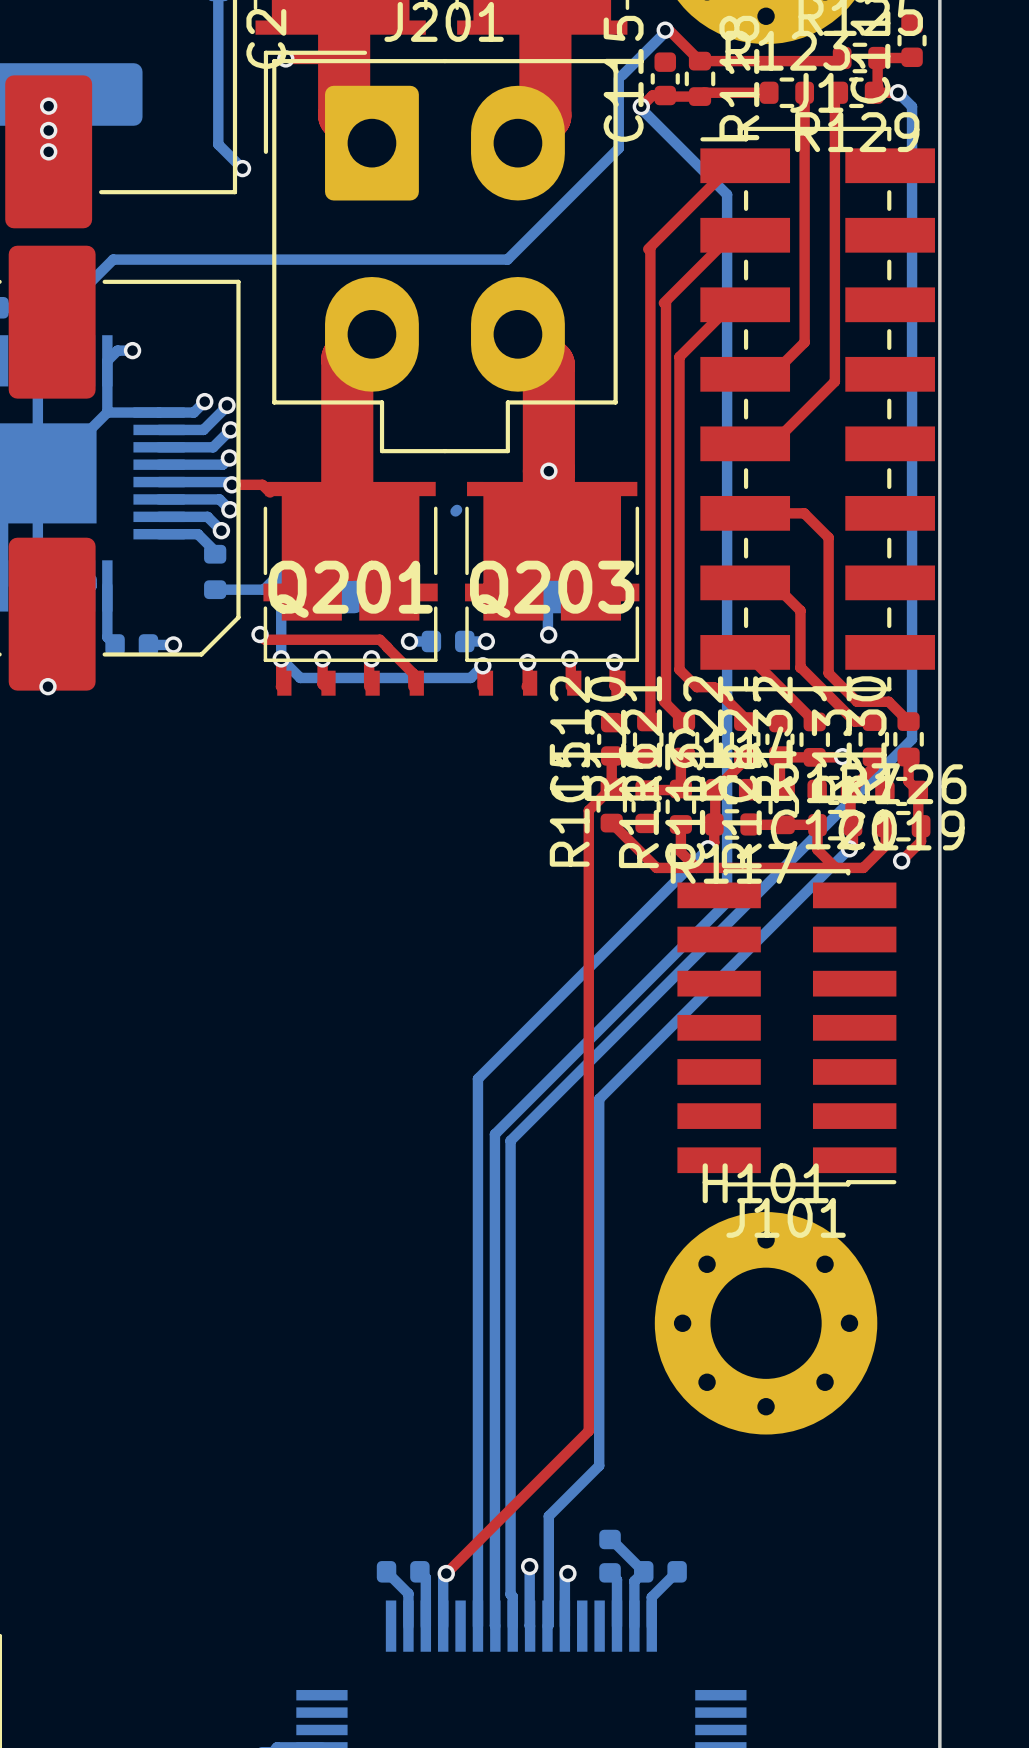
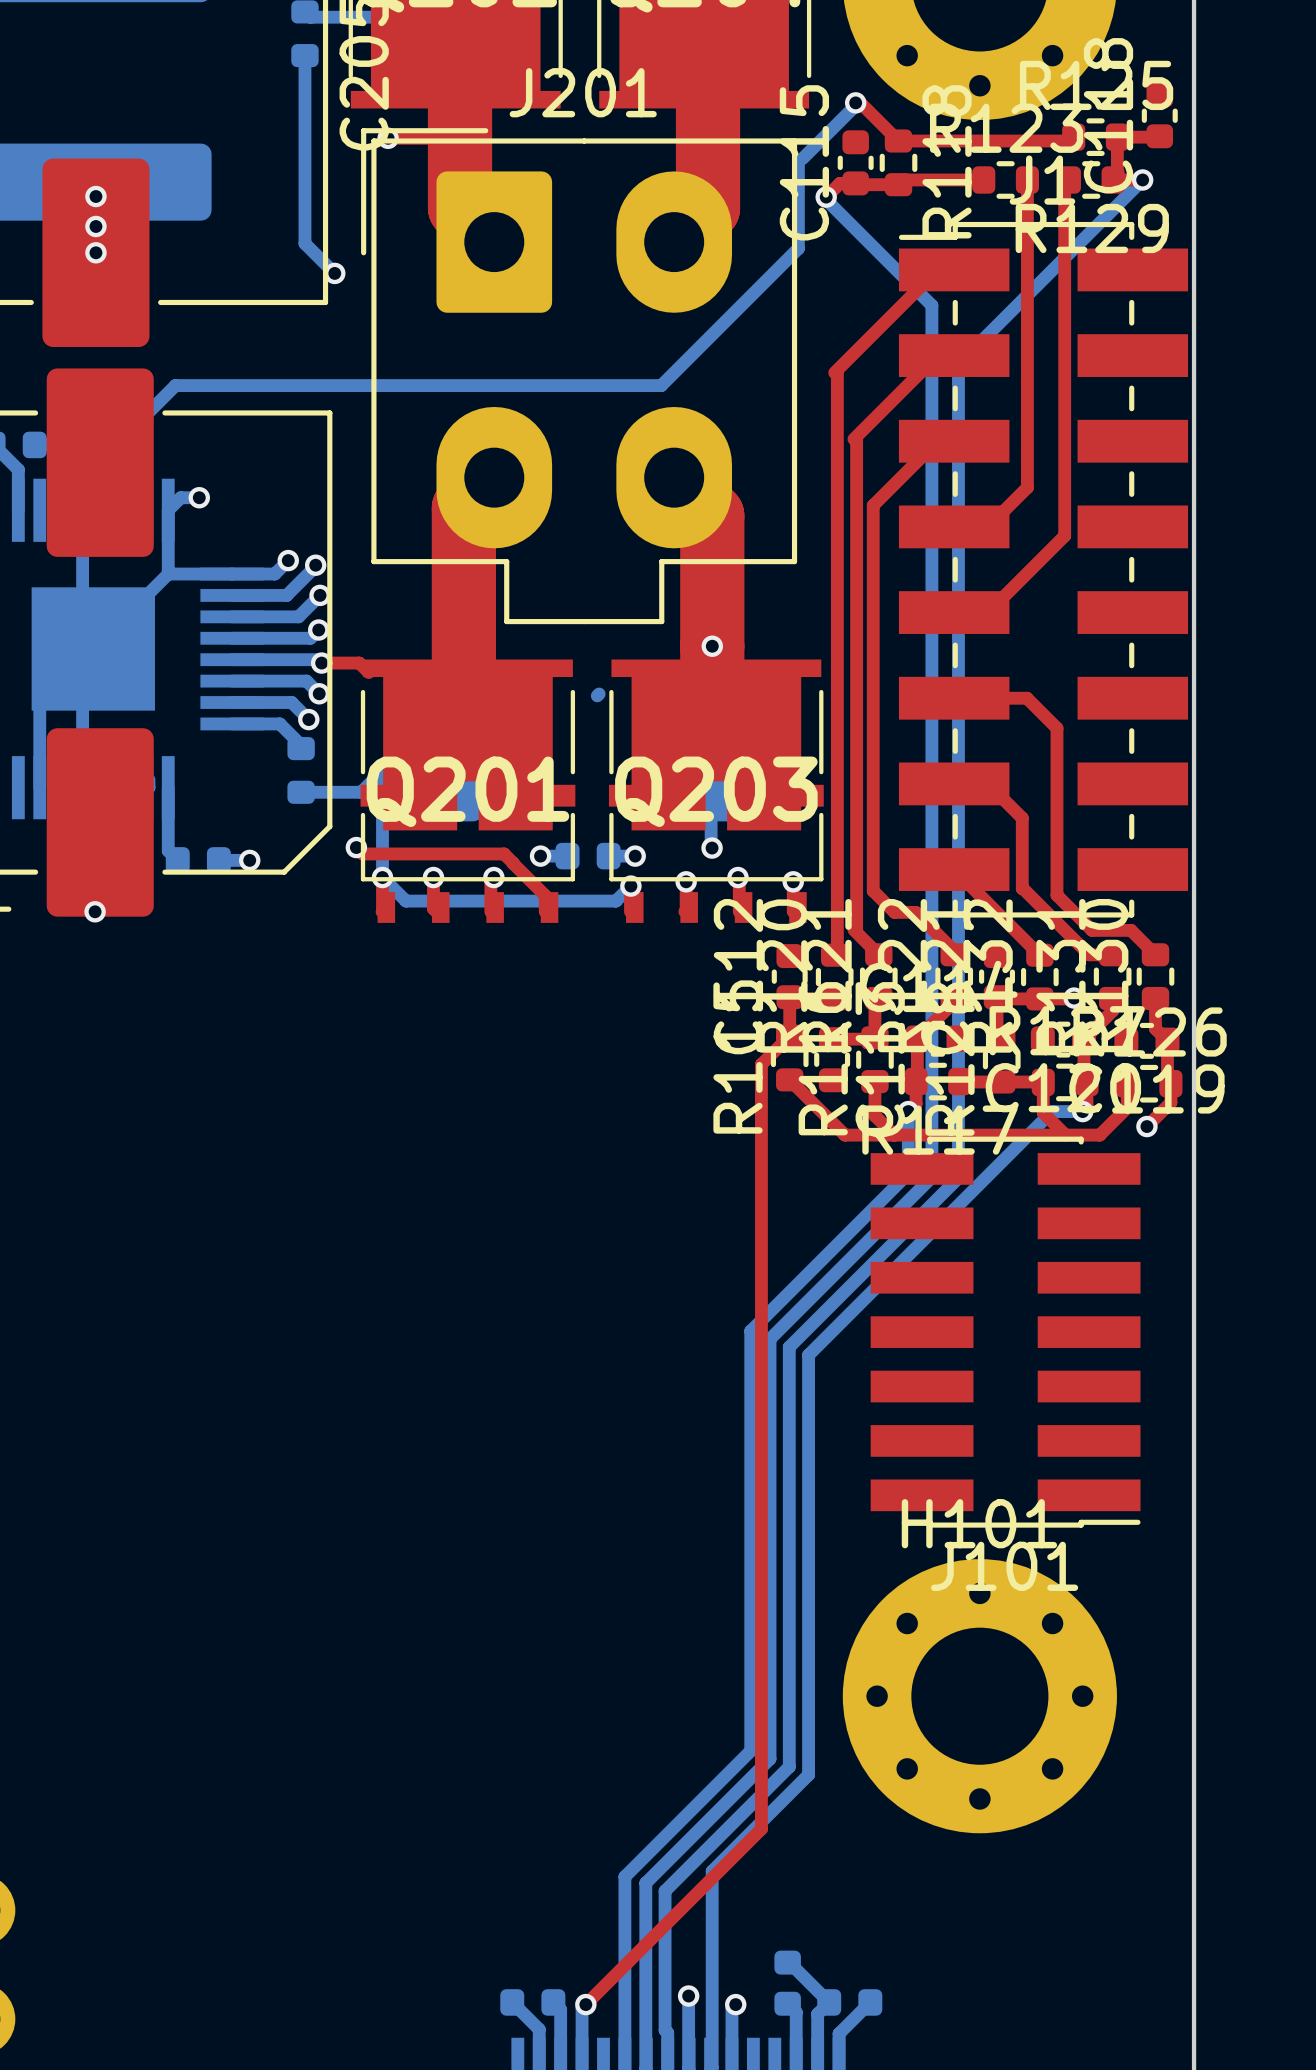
bottom track: (898, 92) (912, 106) (912, 739) (748, 902) -> (1142, 179) (958, 364) (958, 1177)
bottom track: (707, 848) (477, 1078) (477, 1469) -> (908, 1111) (908, 1173) (750, 1331) (750, 1750) (624, 1876)
bottom track: (849, 848) (599, 1099) (599, 1465) (548, 1516) -> (1082, 1111) (1052, 1111) (808, 1355) (808, 1774) (712, 1871) (712, 1933)
bottom track: (595, 1033) (494, 1134) (494, 1474) -> (770, 1339) (770, 1758) (645, 1883)
bottom track: (611, 1039) (510, 1140) (510, 1481) -> (789, 1347) (789, 1766) (665, 1891)

